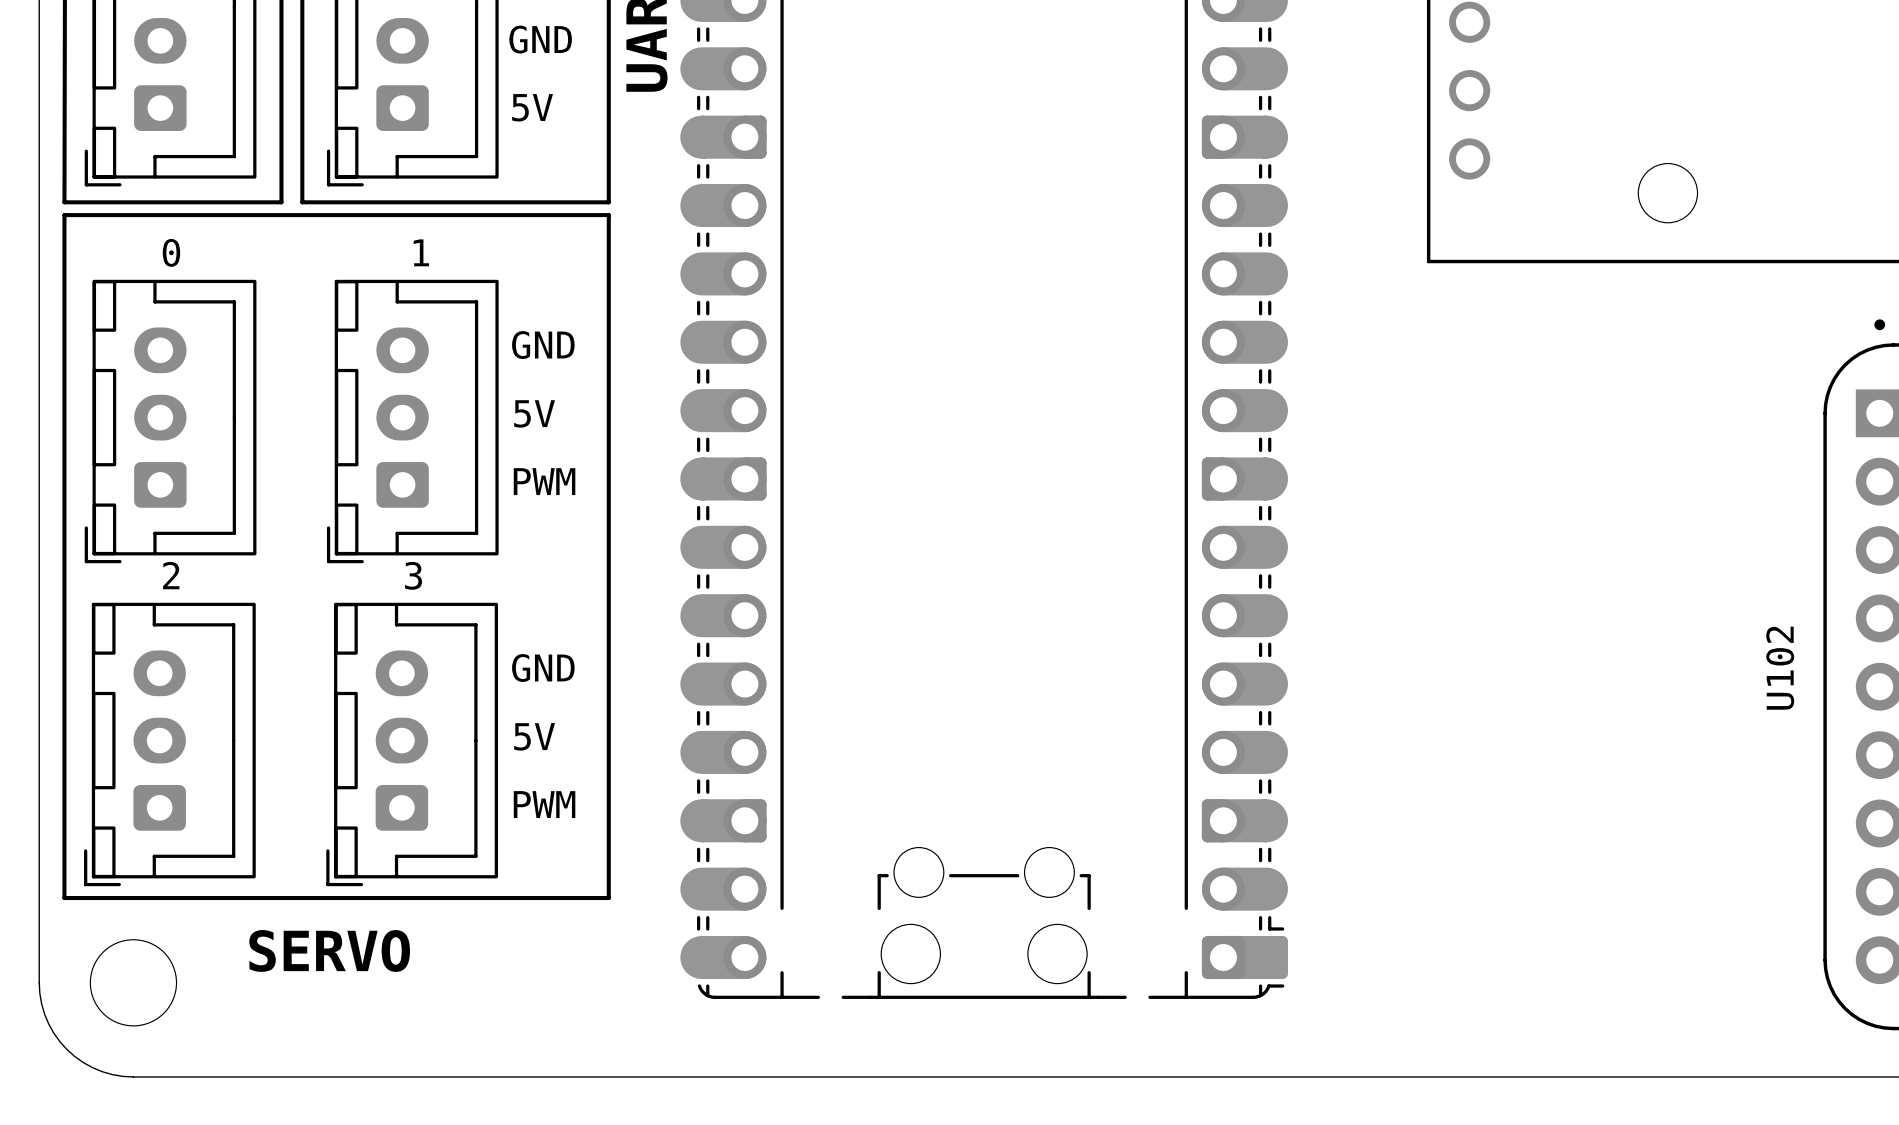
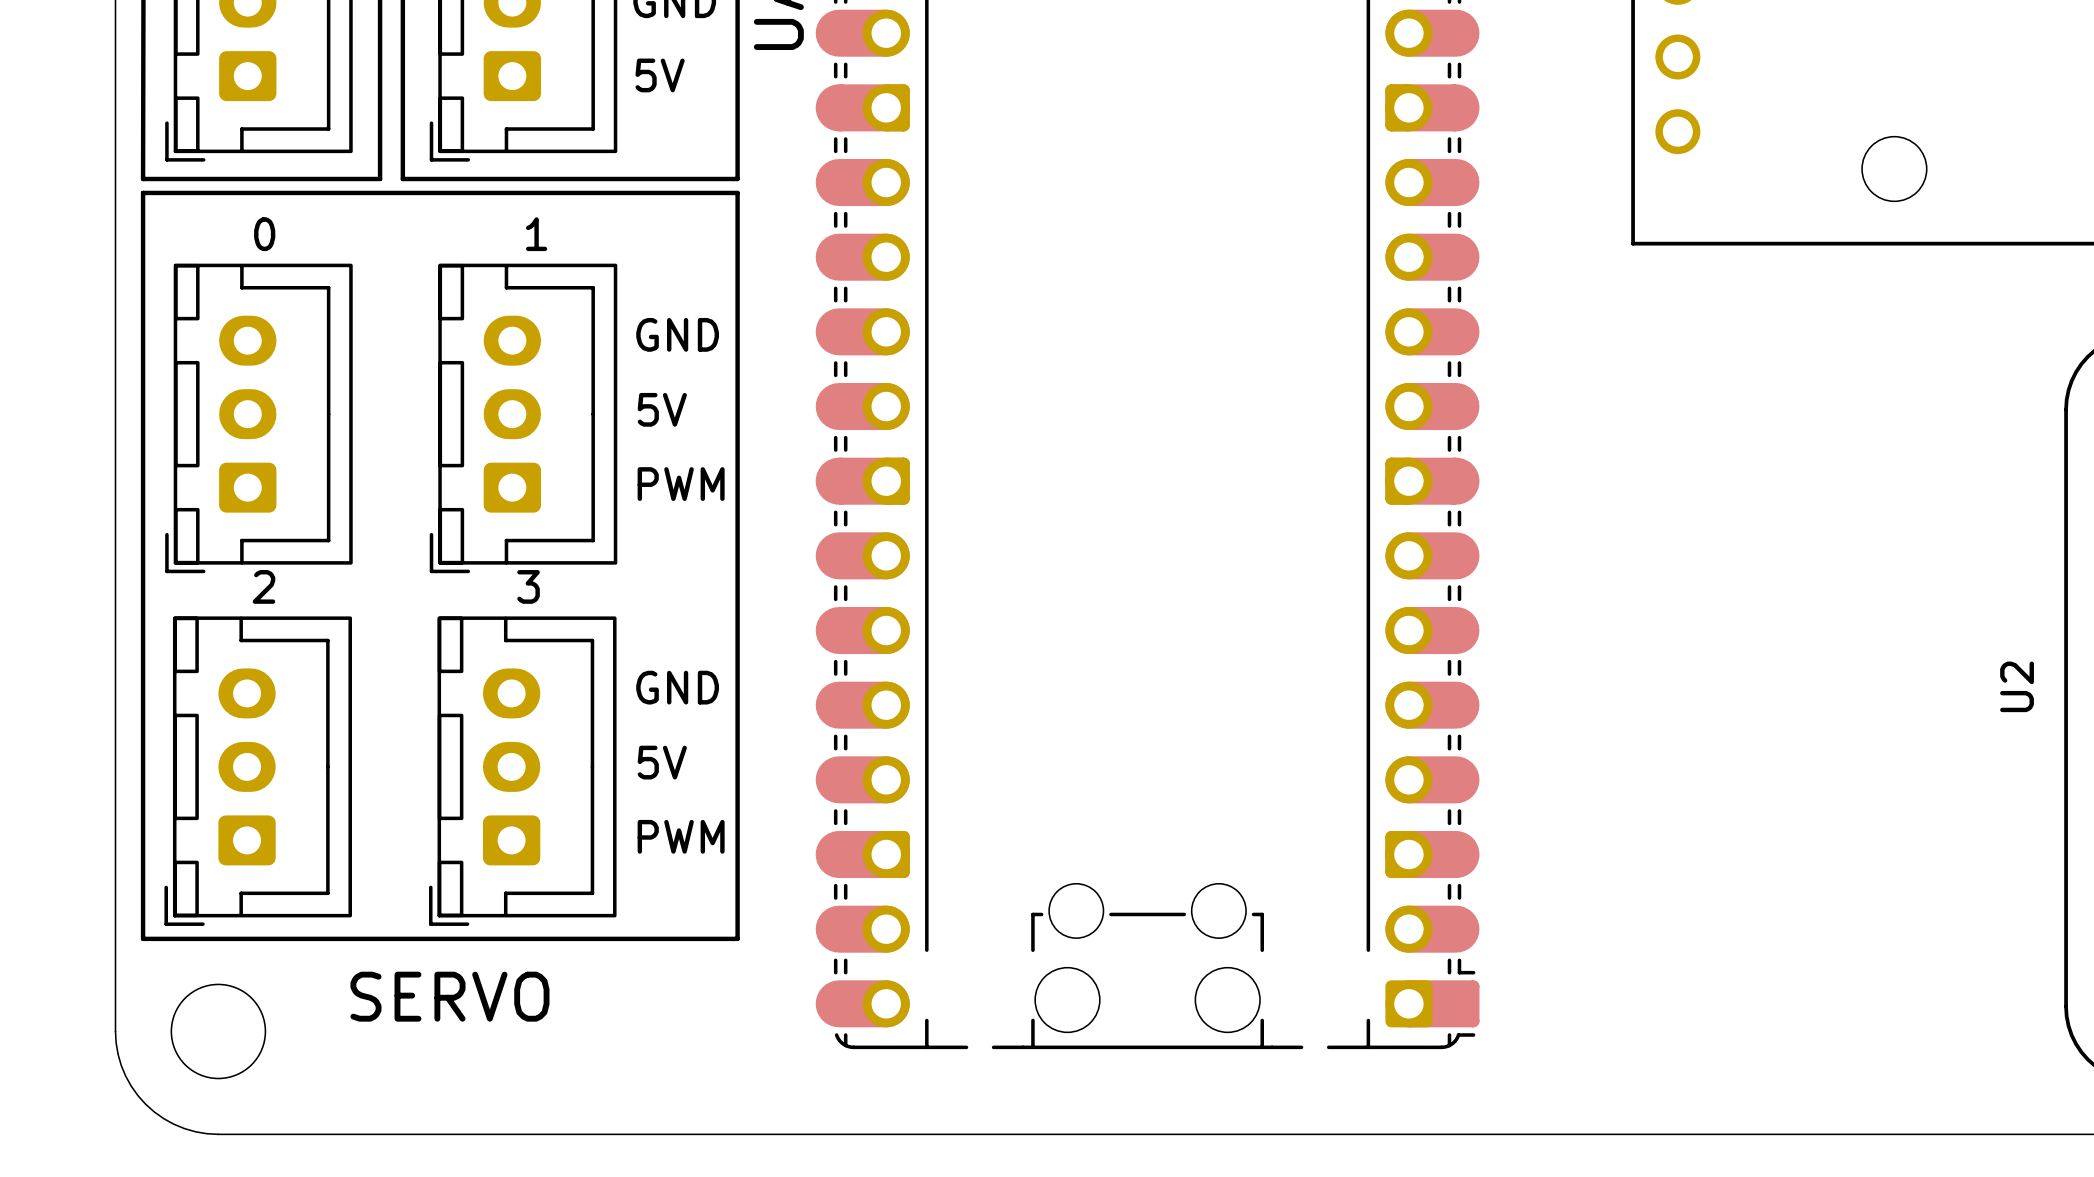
U102 name: U102 (1780, 668) -> U2 (2017, 686)

